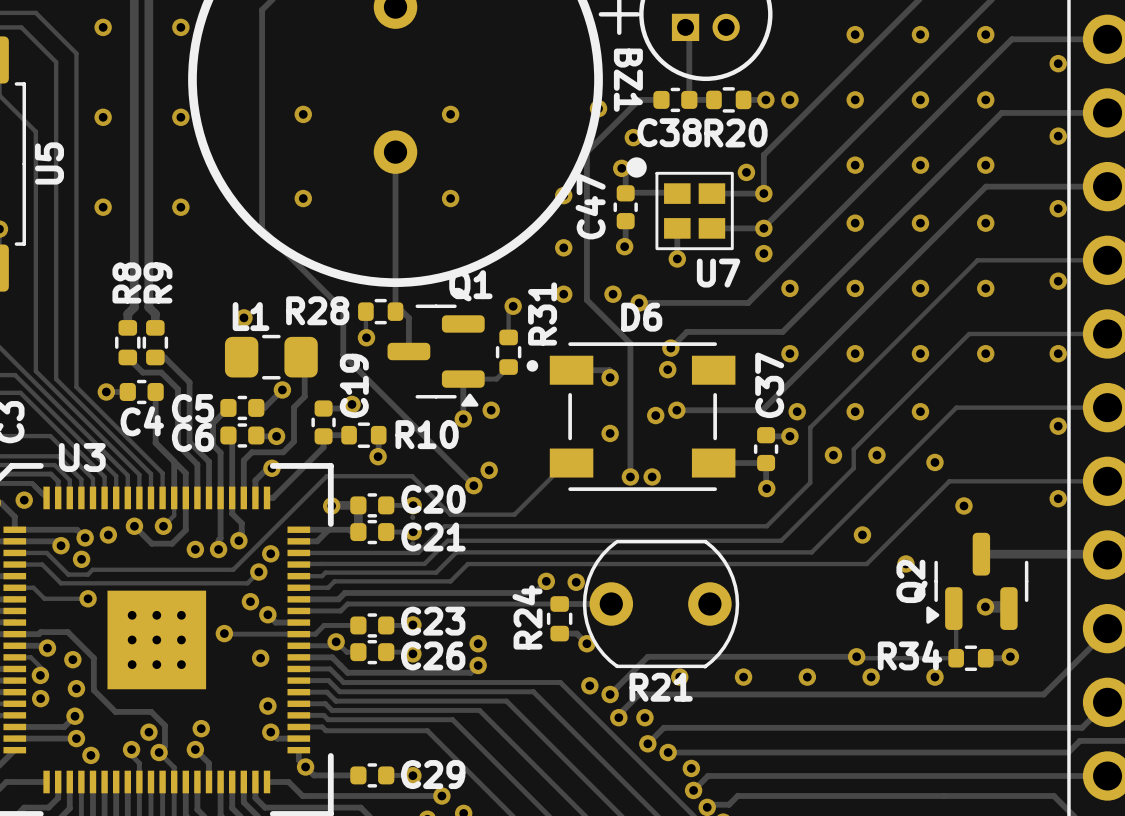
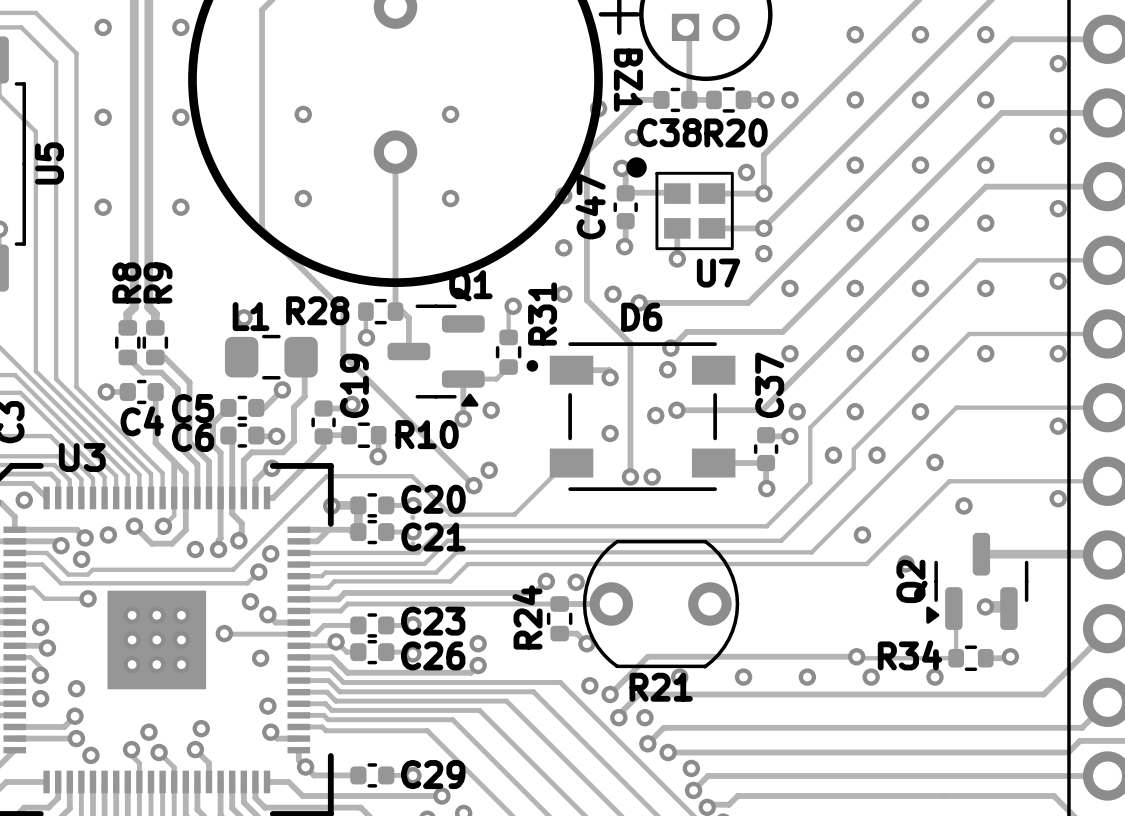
track: (14, 634) (67, 632) (93, 658) (93, 690) (115, 711) (151, 711) (164, 725) (164, 746) (159, 752) -> none
via position: (72, 659) -> (40, 627)

